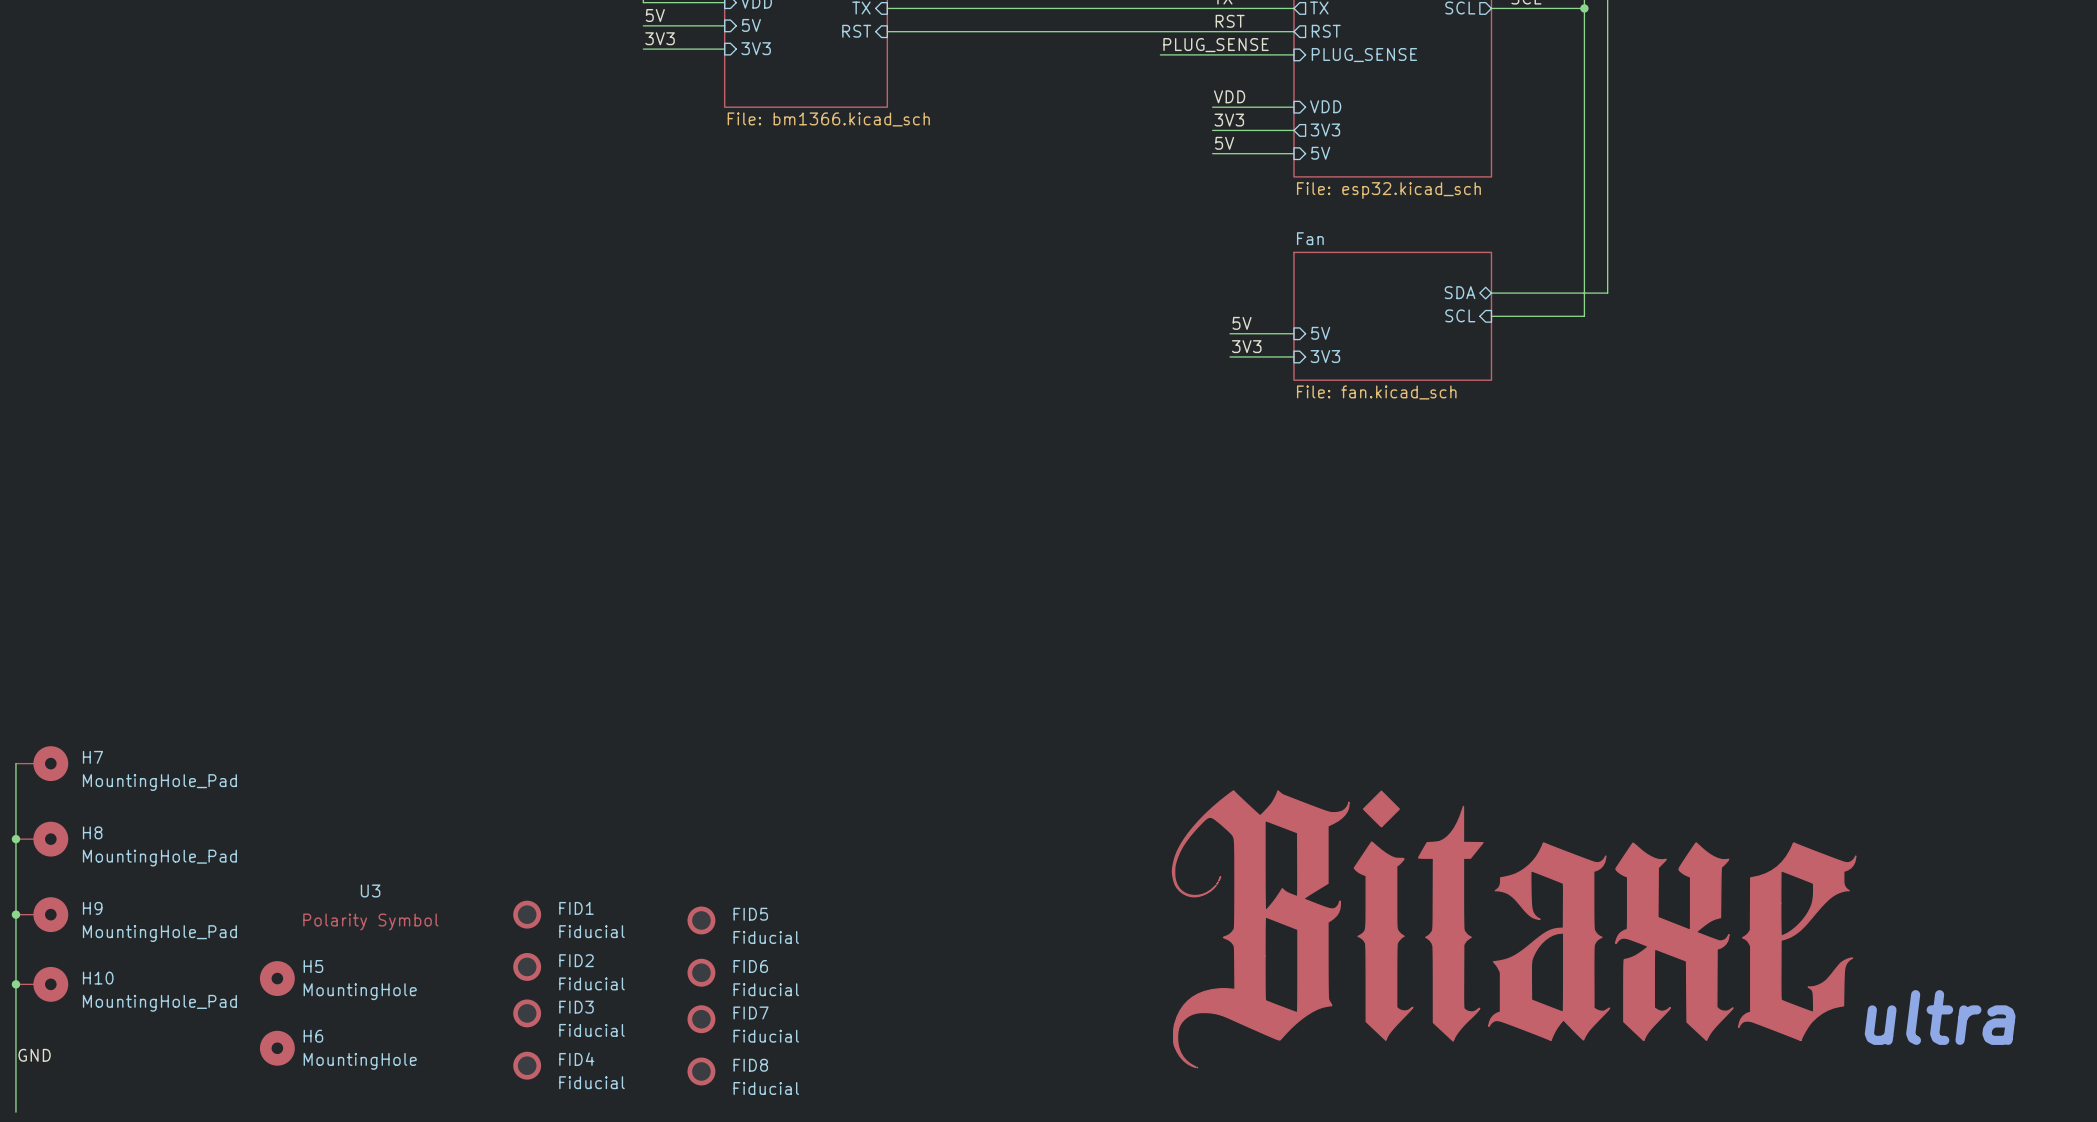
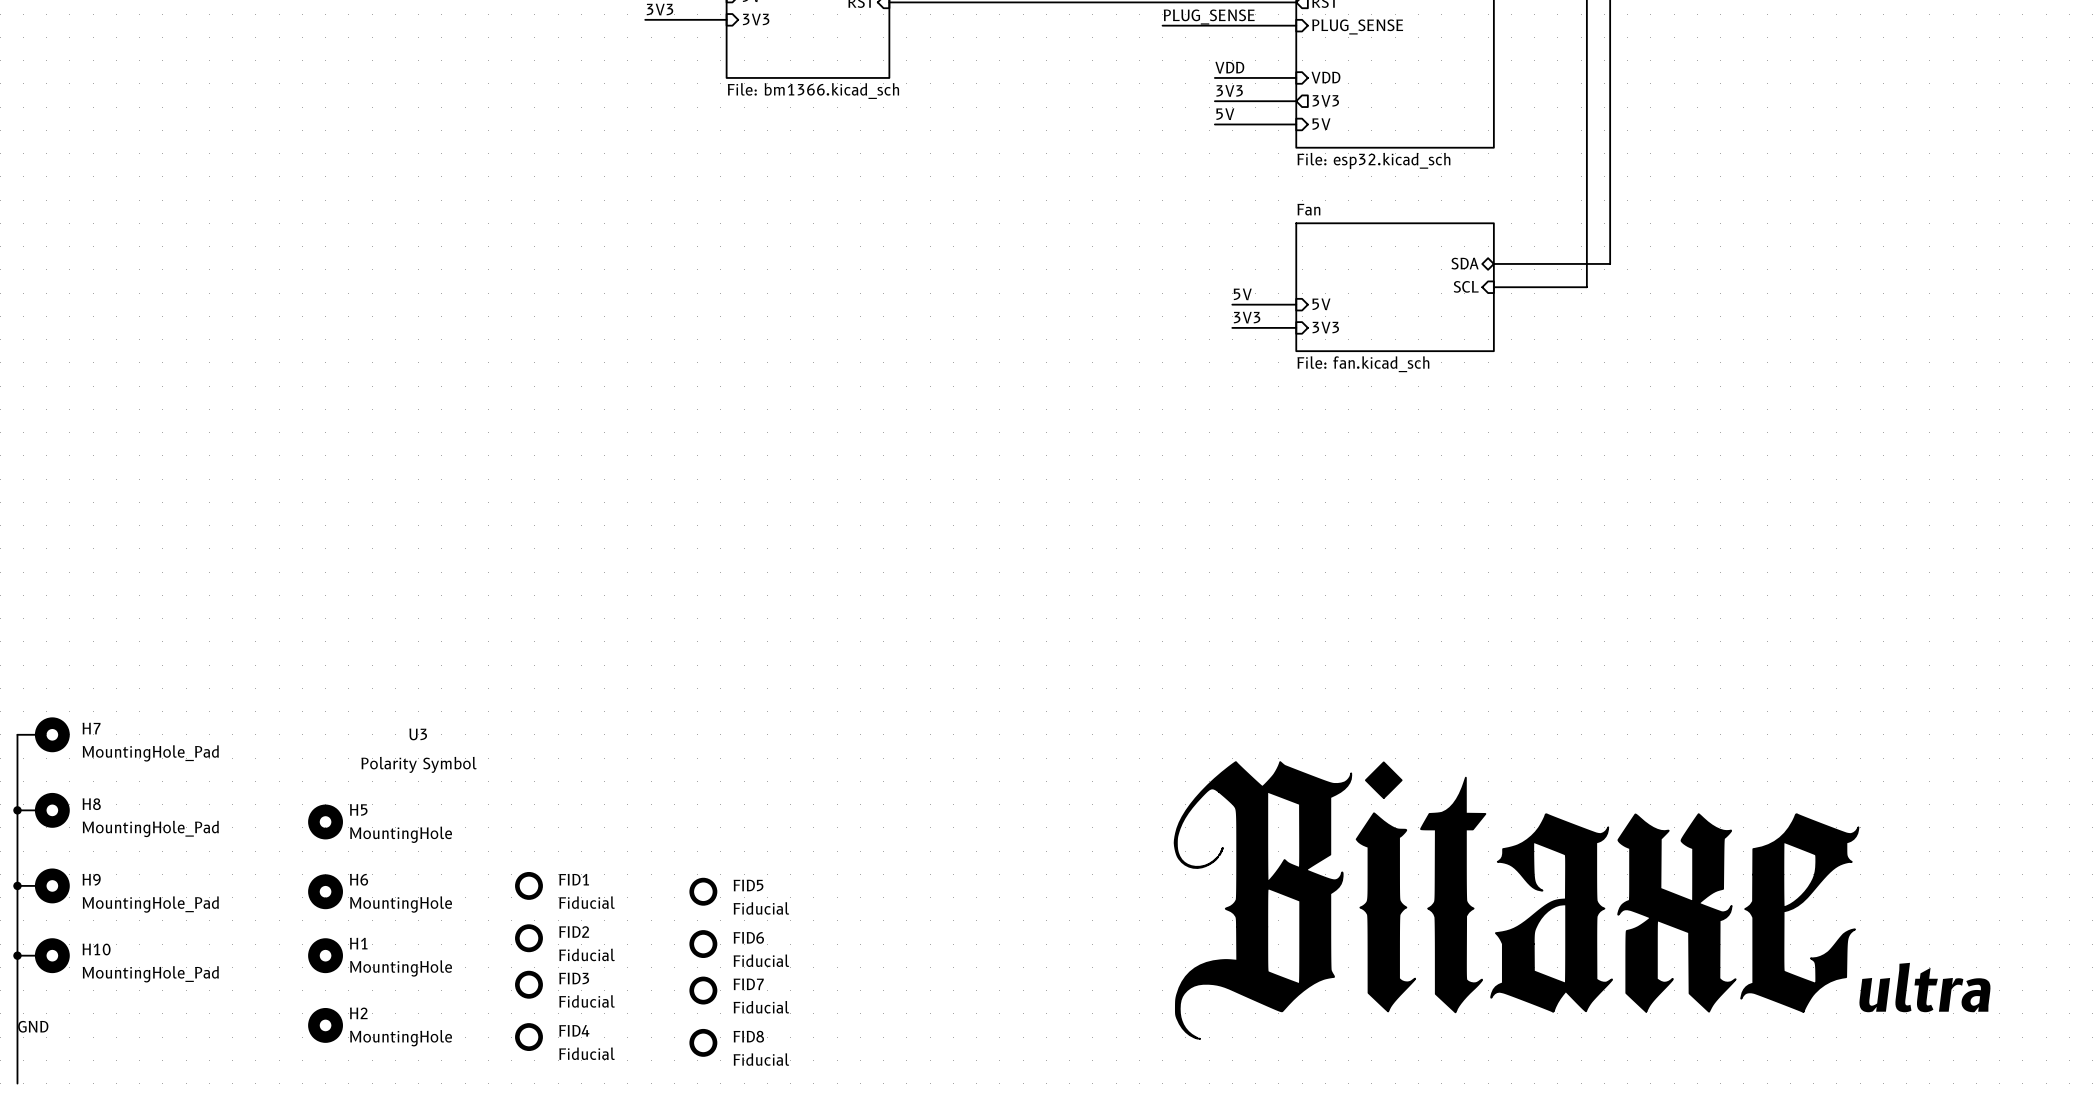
U3 position: (370, 907) -> (419, 750)
H5 position: (277, 978) -> (325, 821)
H1: none -> MountingHole (325, 955)
H6 position: (277, 1048) -> (325, 891)
H2: none -> MountingHole (325, 1025)

